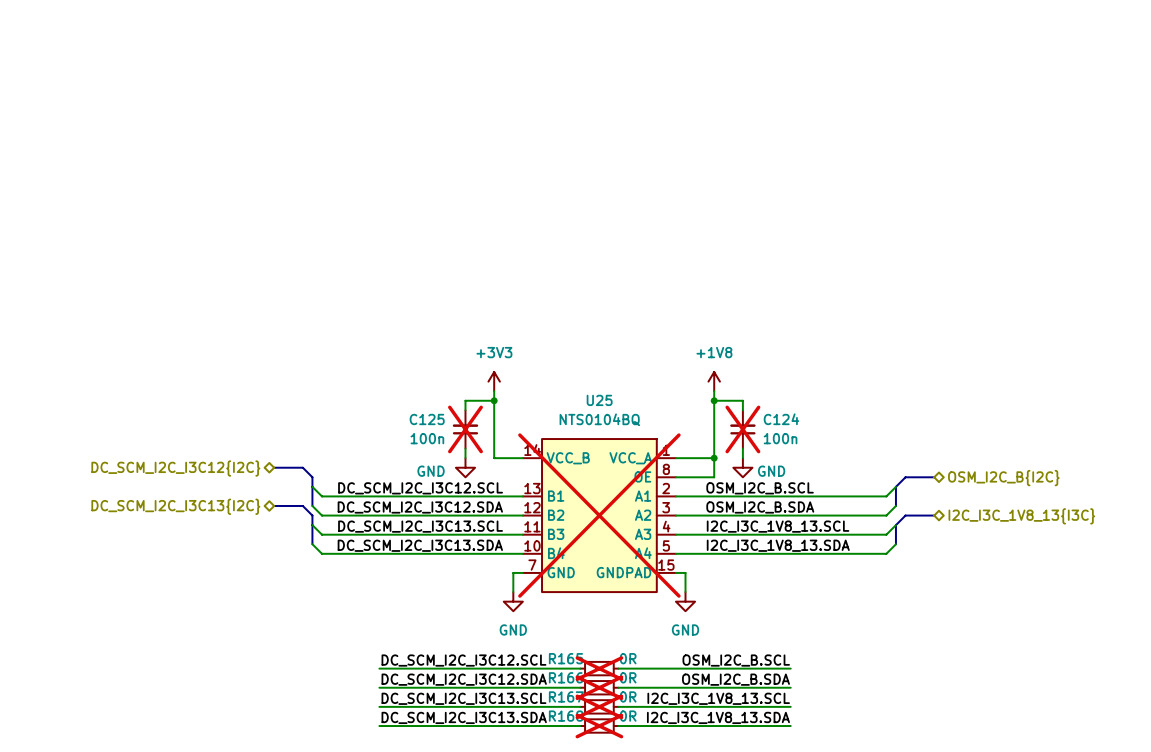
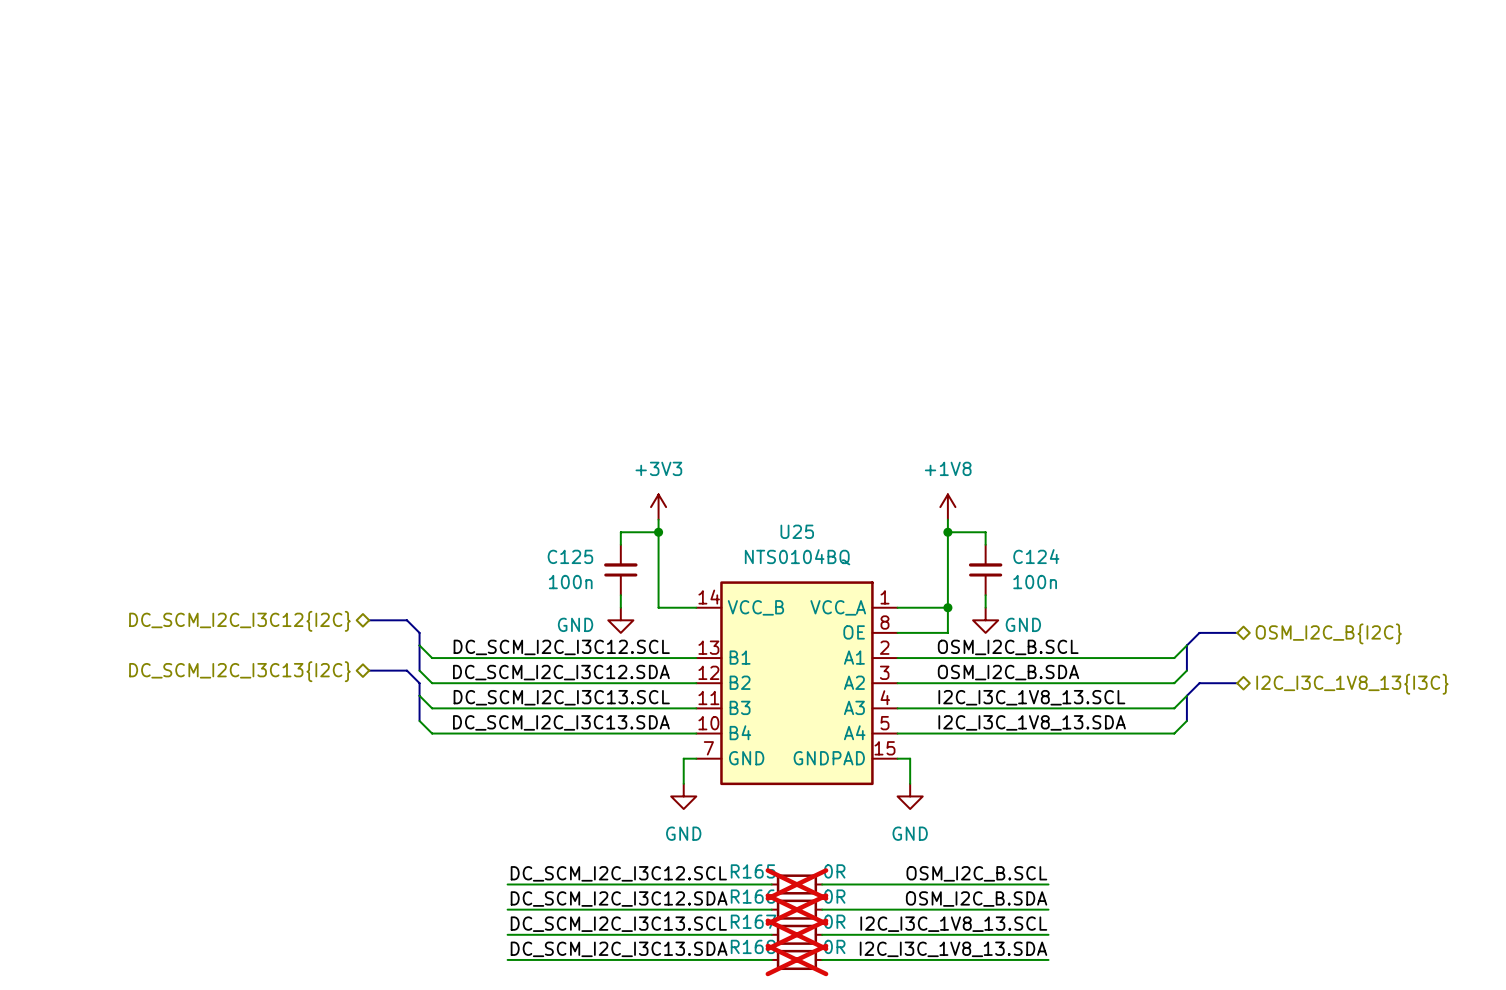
C125 do-not-place cross: (465, 429) -> none
C124 do-not-place cross: (742, 429) -> none
U25 do-not-place cross: (599, 515) -> none

